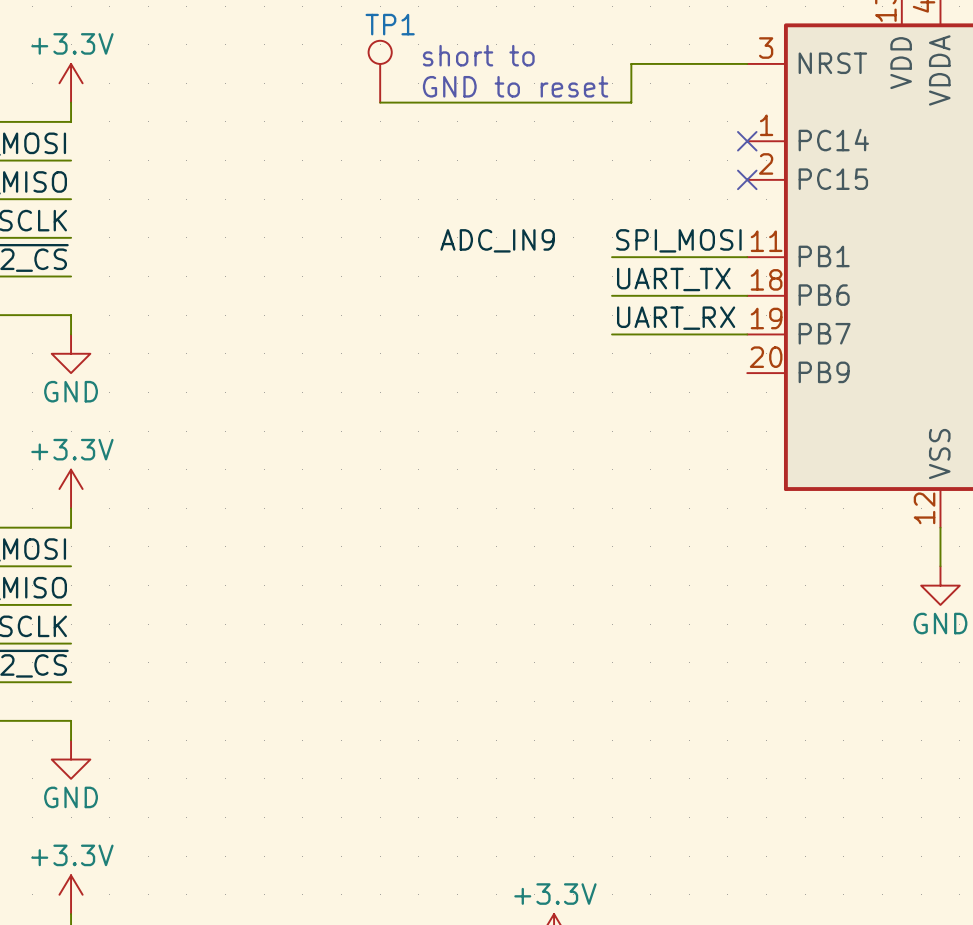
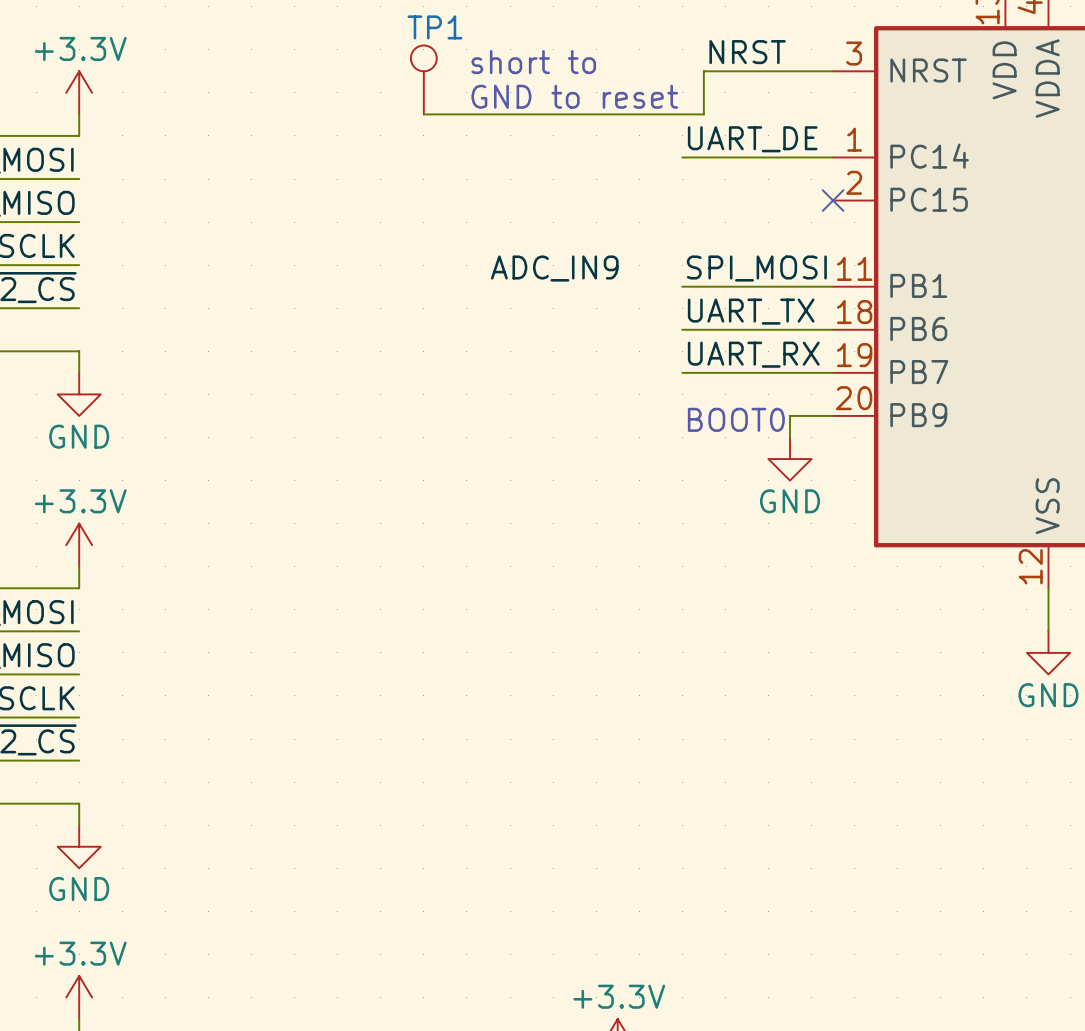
label: none -> NRST (747, 52)
label: none -> UART_DE (752, 139)
wire: none -> (682, 157) (833, 157)
no-connect mark: (747, 141) -> none
wire: none -> (833, 415) (790, 415) (790, 437)
text: none -> BOOT0 (736, 419)
power symbol: none -> GND (790, 459)

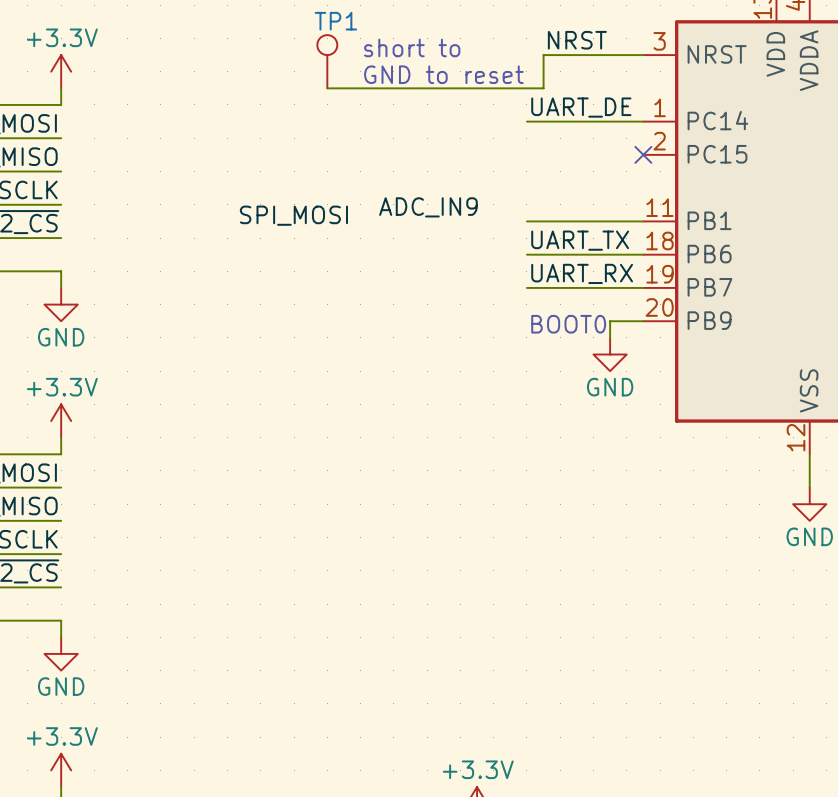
label position: SPI_MOSI (756, 268) -> SPI_MOSI (293, 215)

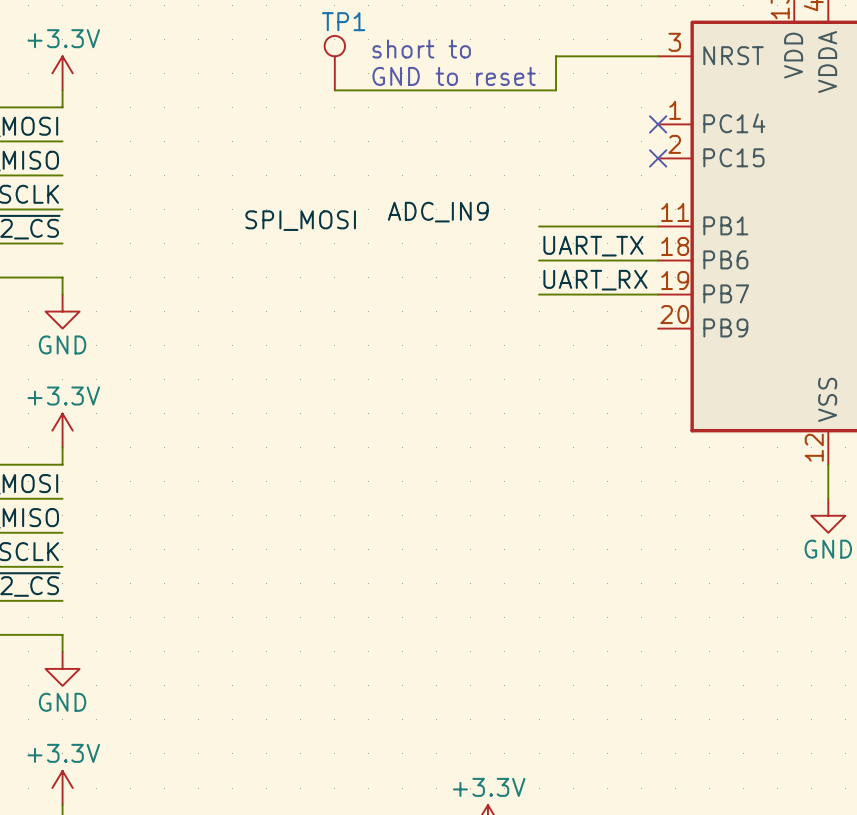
label: NRST (577, 40) -> none
label: UART_DE (581, 107) -> none
wire: (526, 121) (643, 121) -> none
no-connect mark: none -> (658, 124)
wire: (643, 321) (610, 321) (610, 337) -> none
text: BOOT0 (568, 324) -> none
power symbol: GND (610, 354) -> none

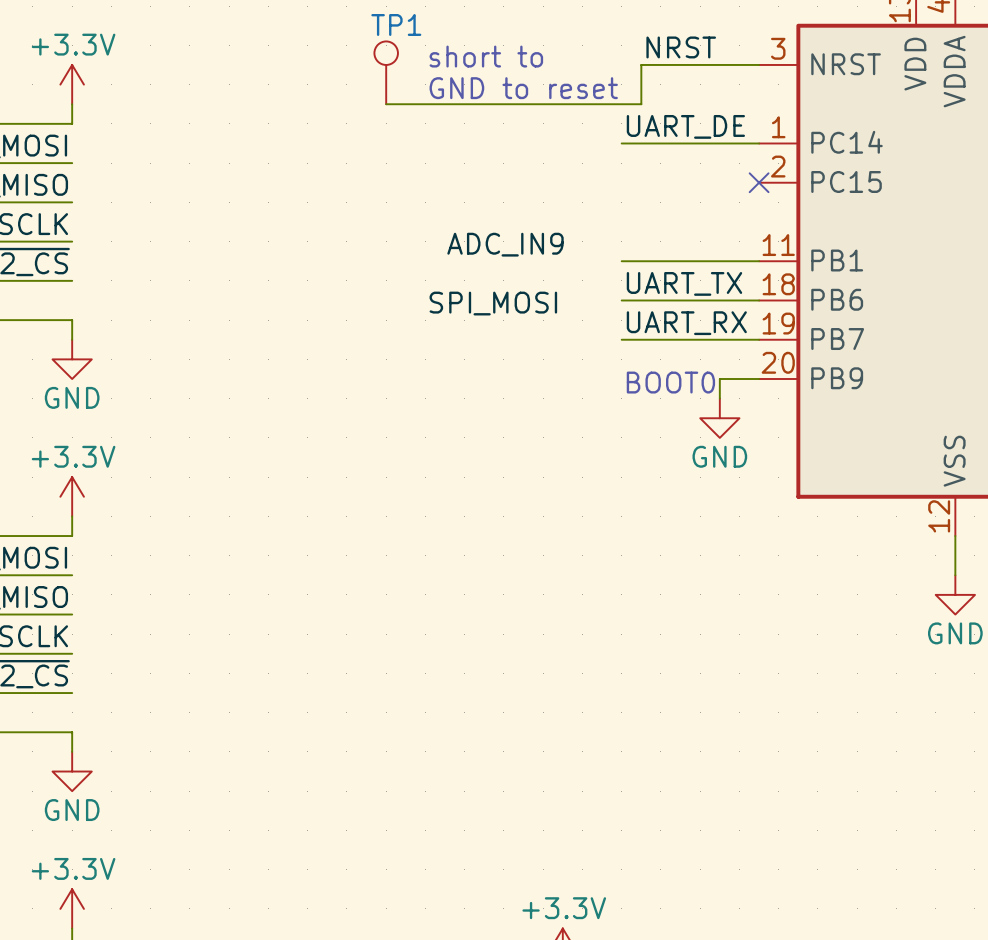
label: none -> NRST (681, 47)
label: none -> UART_DE (685, 126)
wire: none -> (621, 143) (759, 143)
no-connect mark: (658, 124) -> none
label position: SPI_MOSI (300, 220) -> SPI_MOSI (493, 303)
wire: none -> (759, 379) (719, 379) (719, 398)
text: none -> BOOT0 (670, 382)
power symbol: none -> GND (719, 418)

